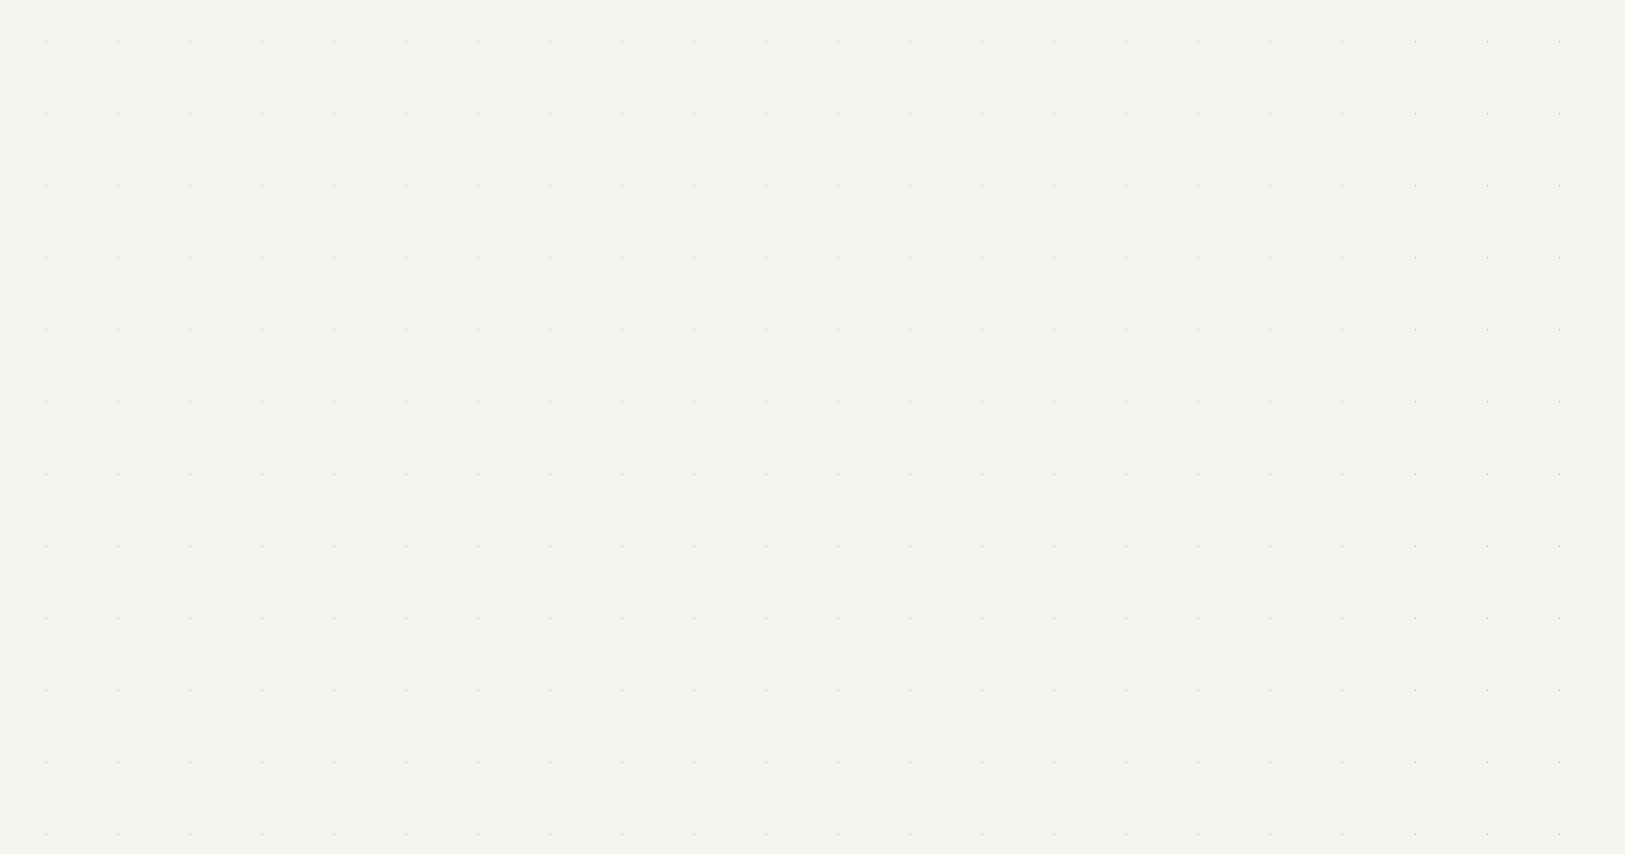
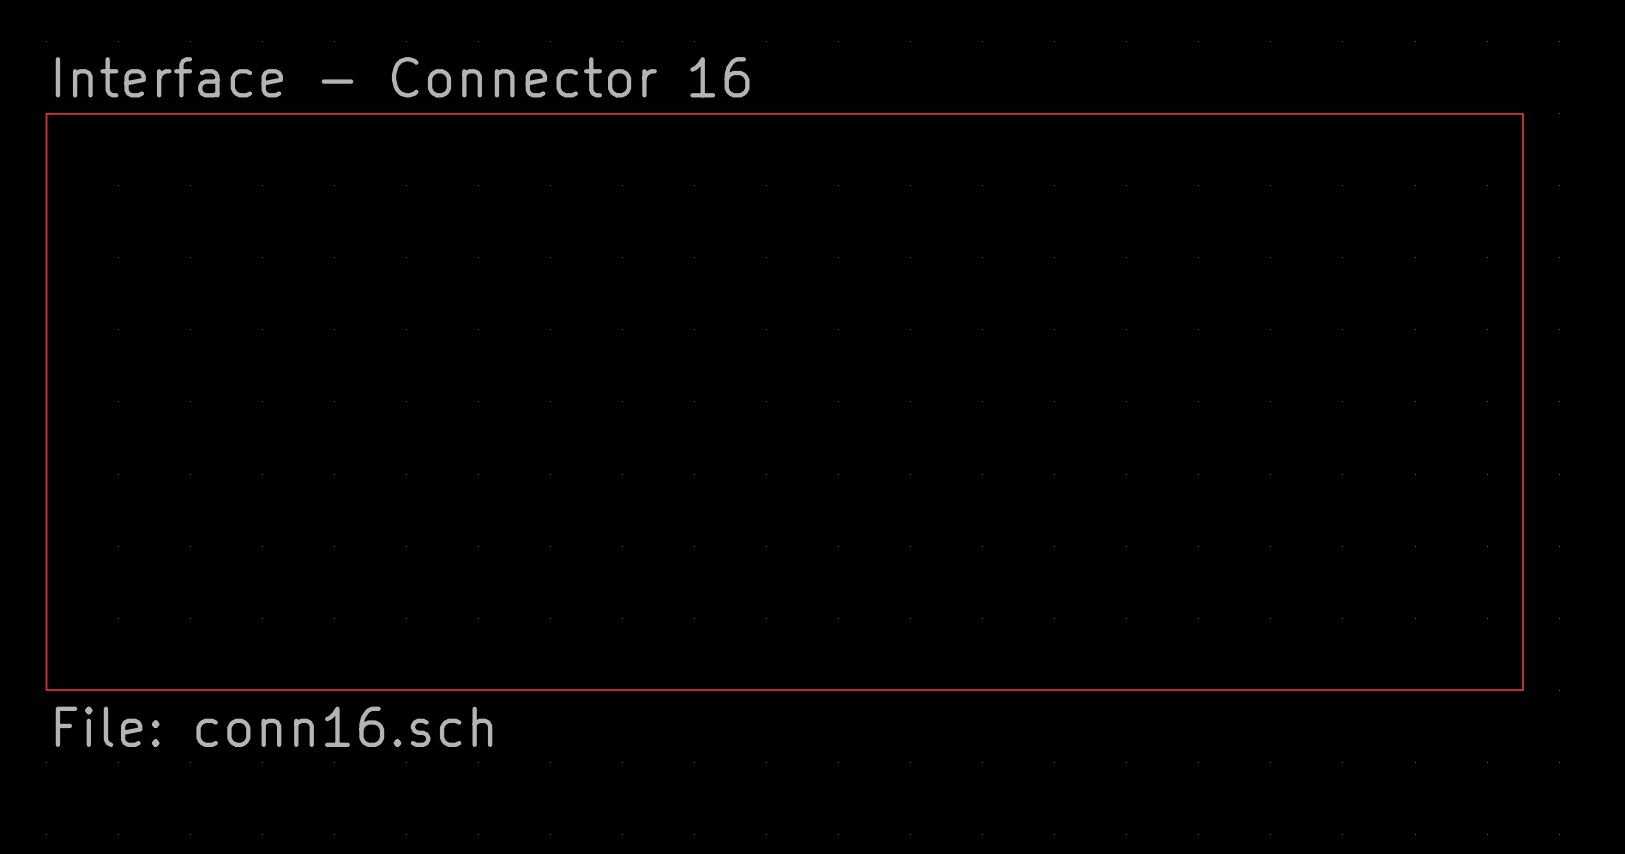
sheet Interface - Connector 16: none -> File: conn16.sch (784, 401)

